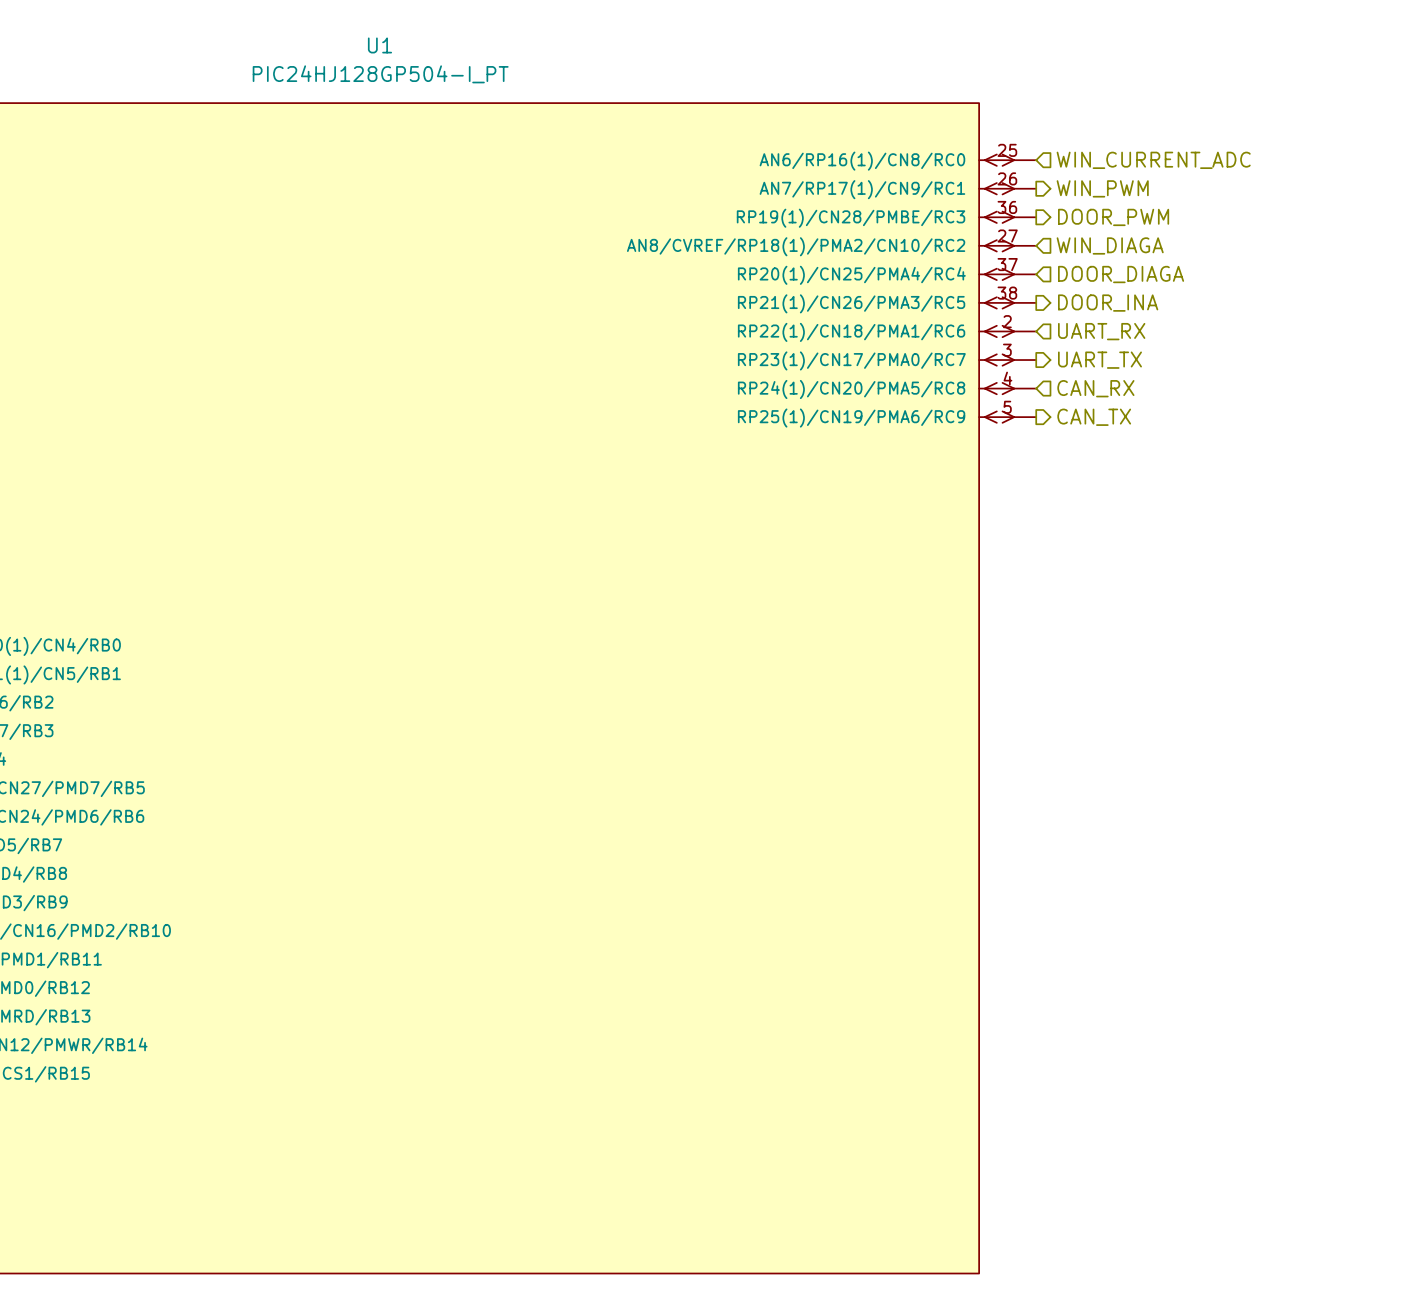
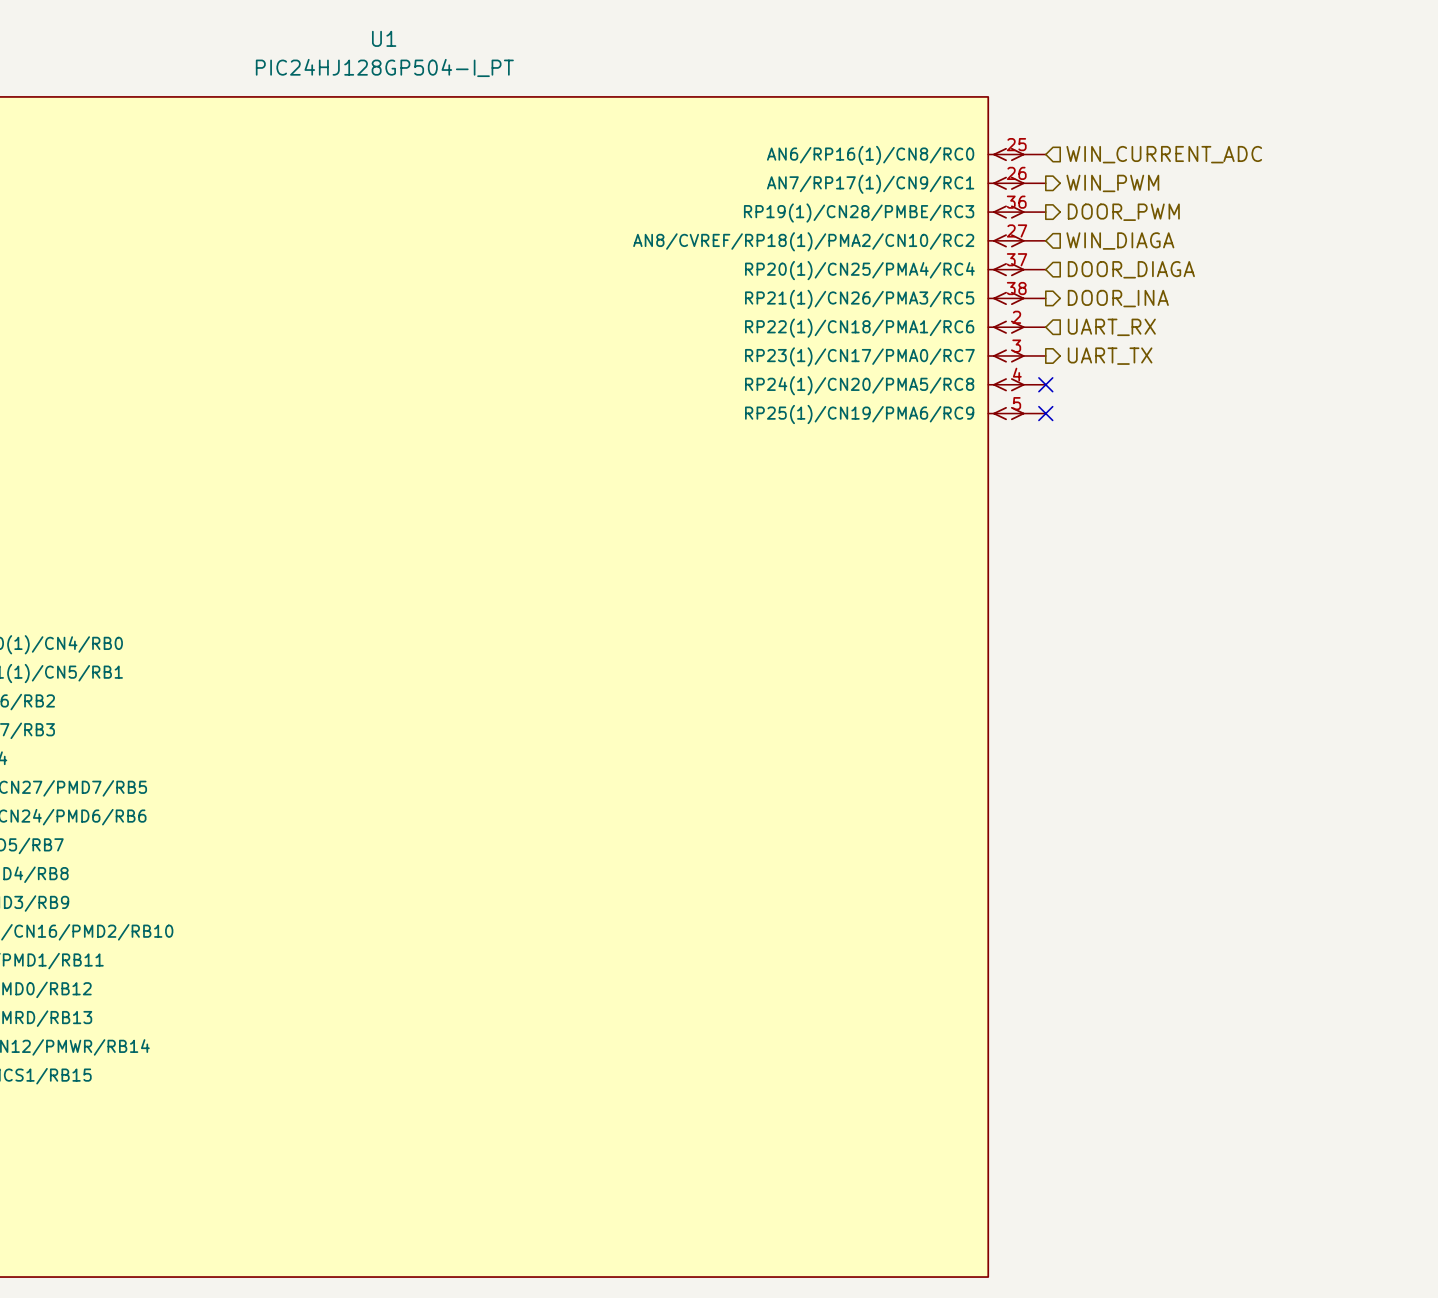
no-connect mark: none -> (1045, 384)
hierarchical label: CAN_RX (1095, 388) -> none
no-connect mark: none -> (1045, 413)
hierarchical label: CAN_TX (1094, 417) -> none

